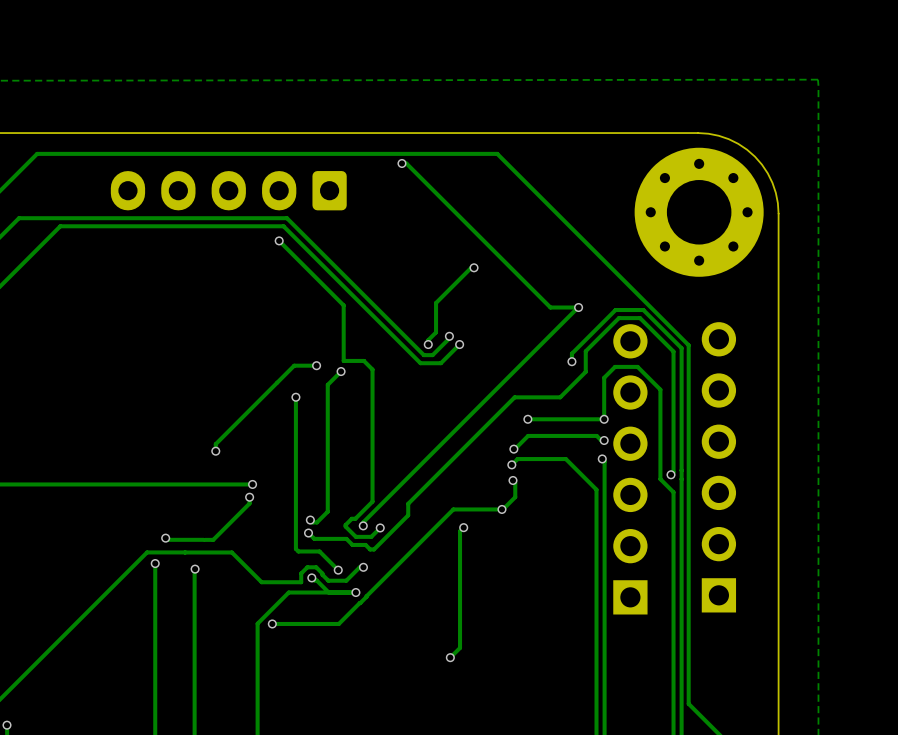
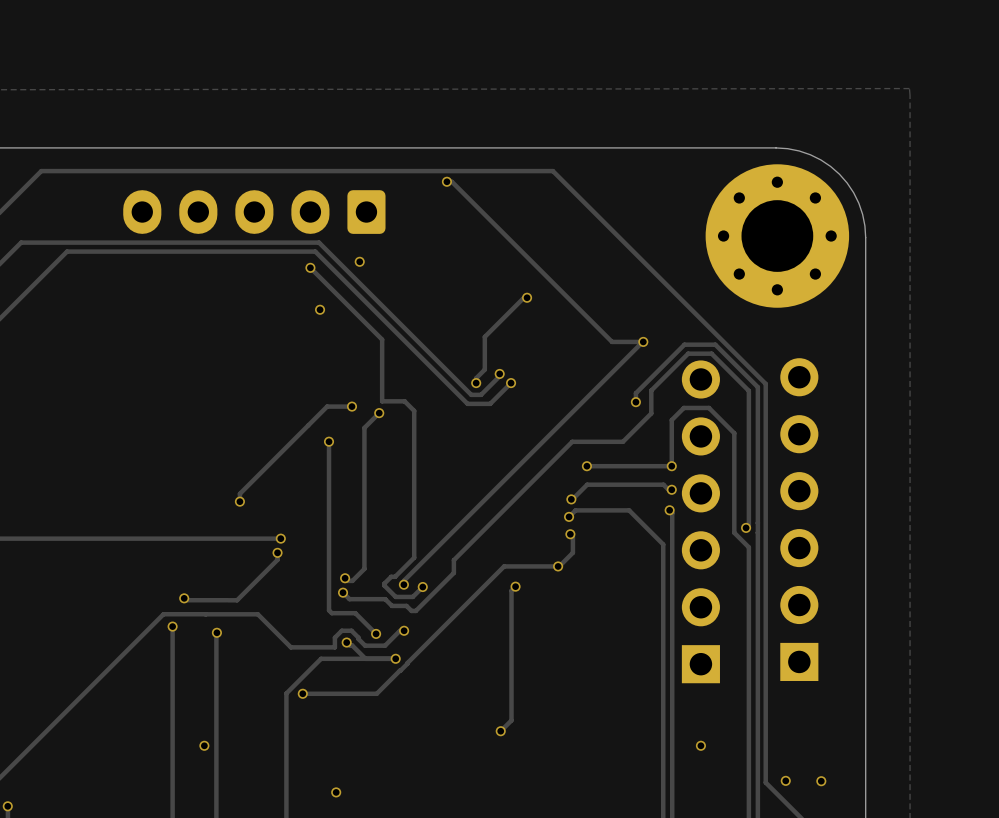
via: none -> (359, 261)
via: none -> (320, 309)
via: none -> (204, 745)
via: none -> (700, 745)
via: none -> (785, 780)
via: none -> (821, 781)
via: none -> (336, 792)

